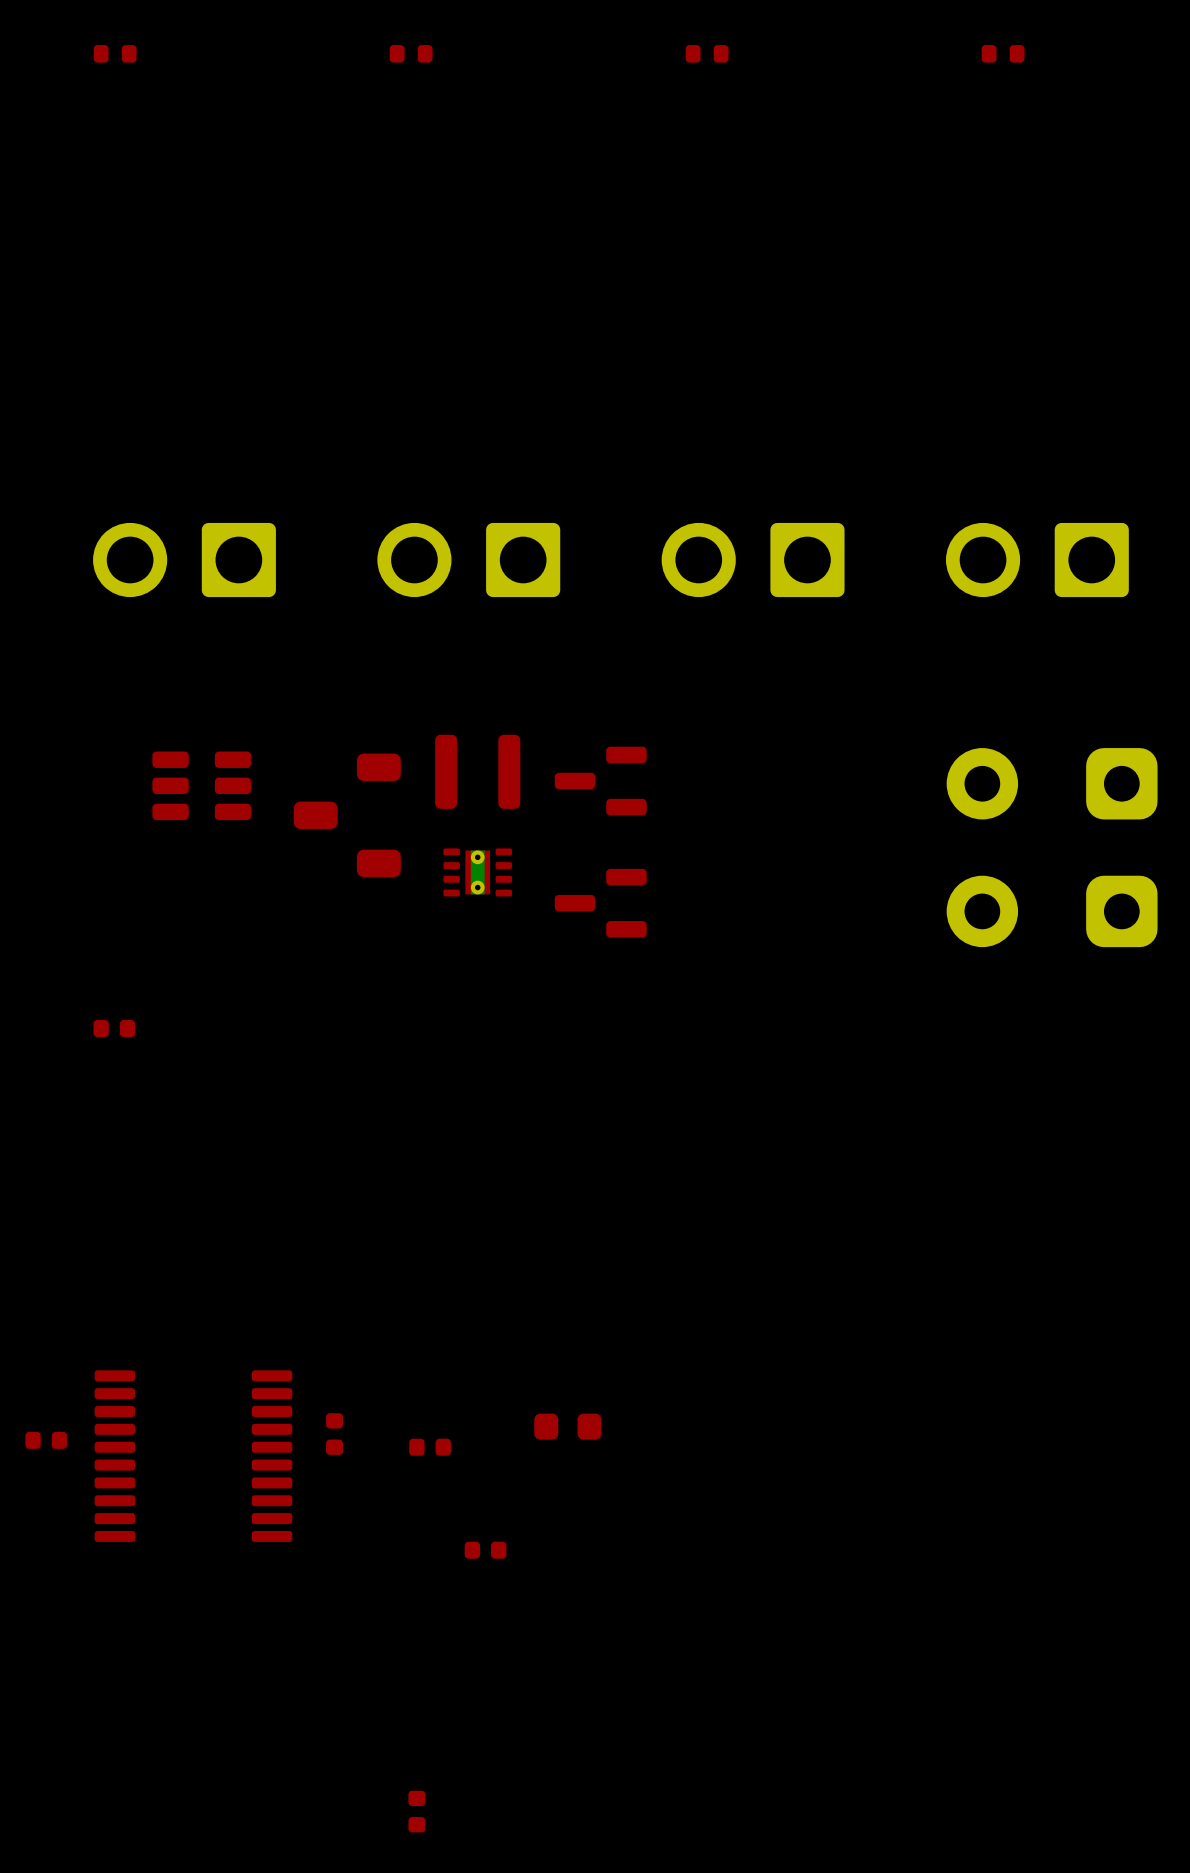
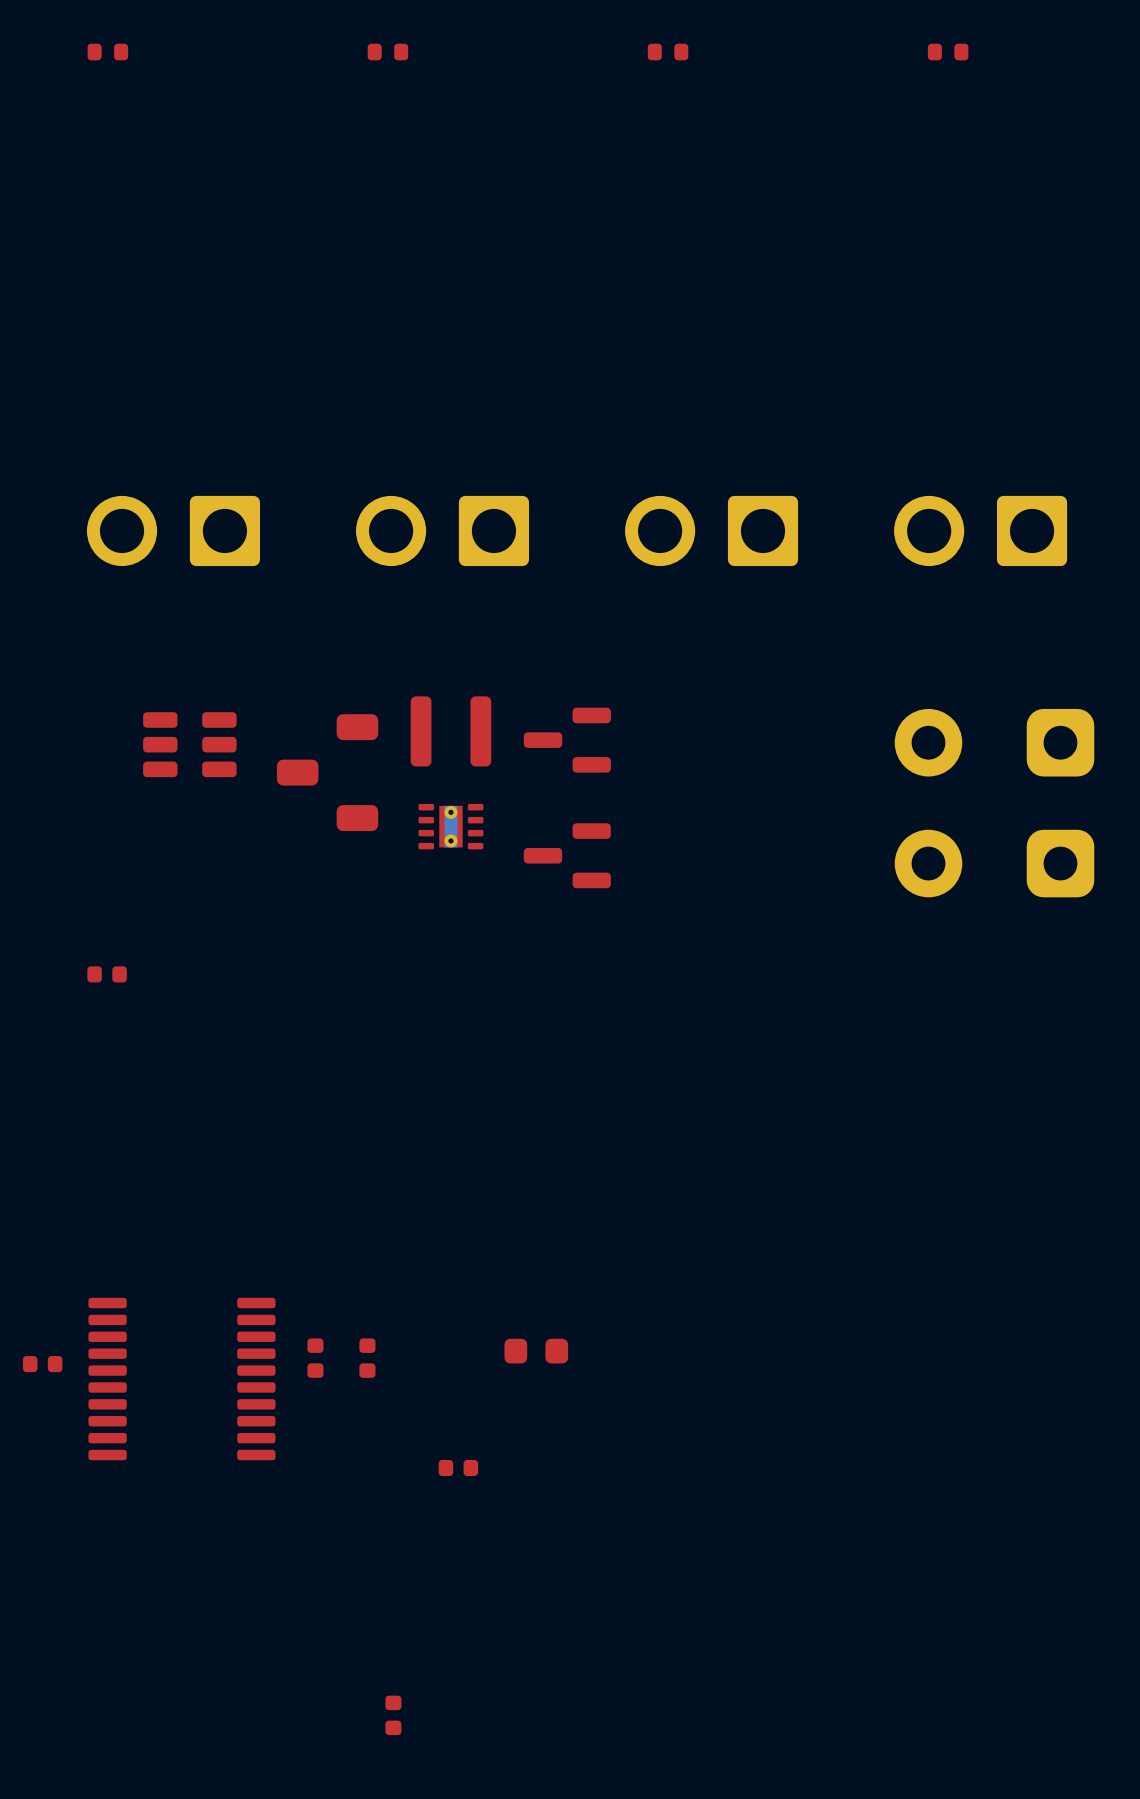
part rotation: 0° (430, 1447) -> 90° clockwise (367, 1358)
part position: (430, 1447) -> (367, 1358)

